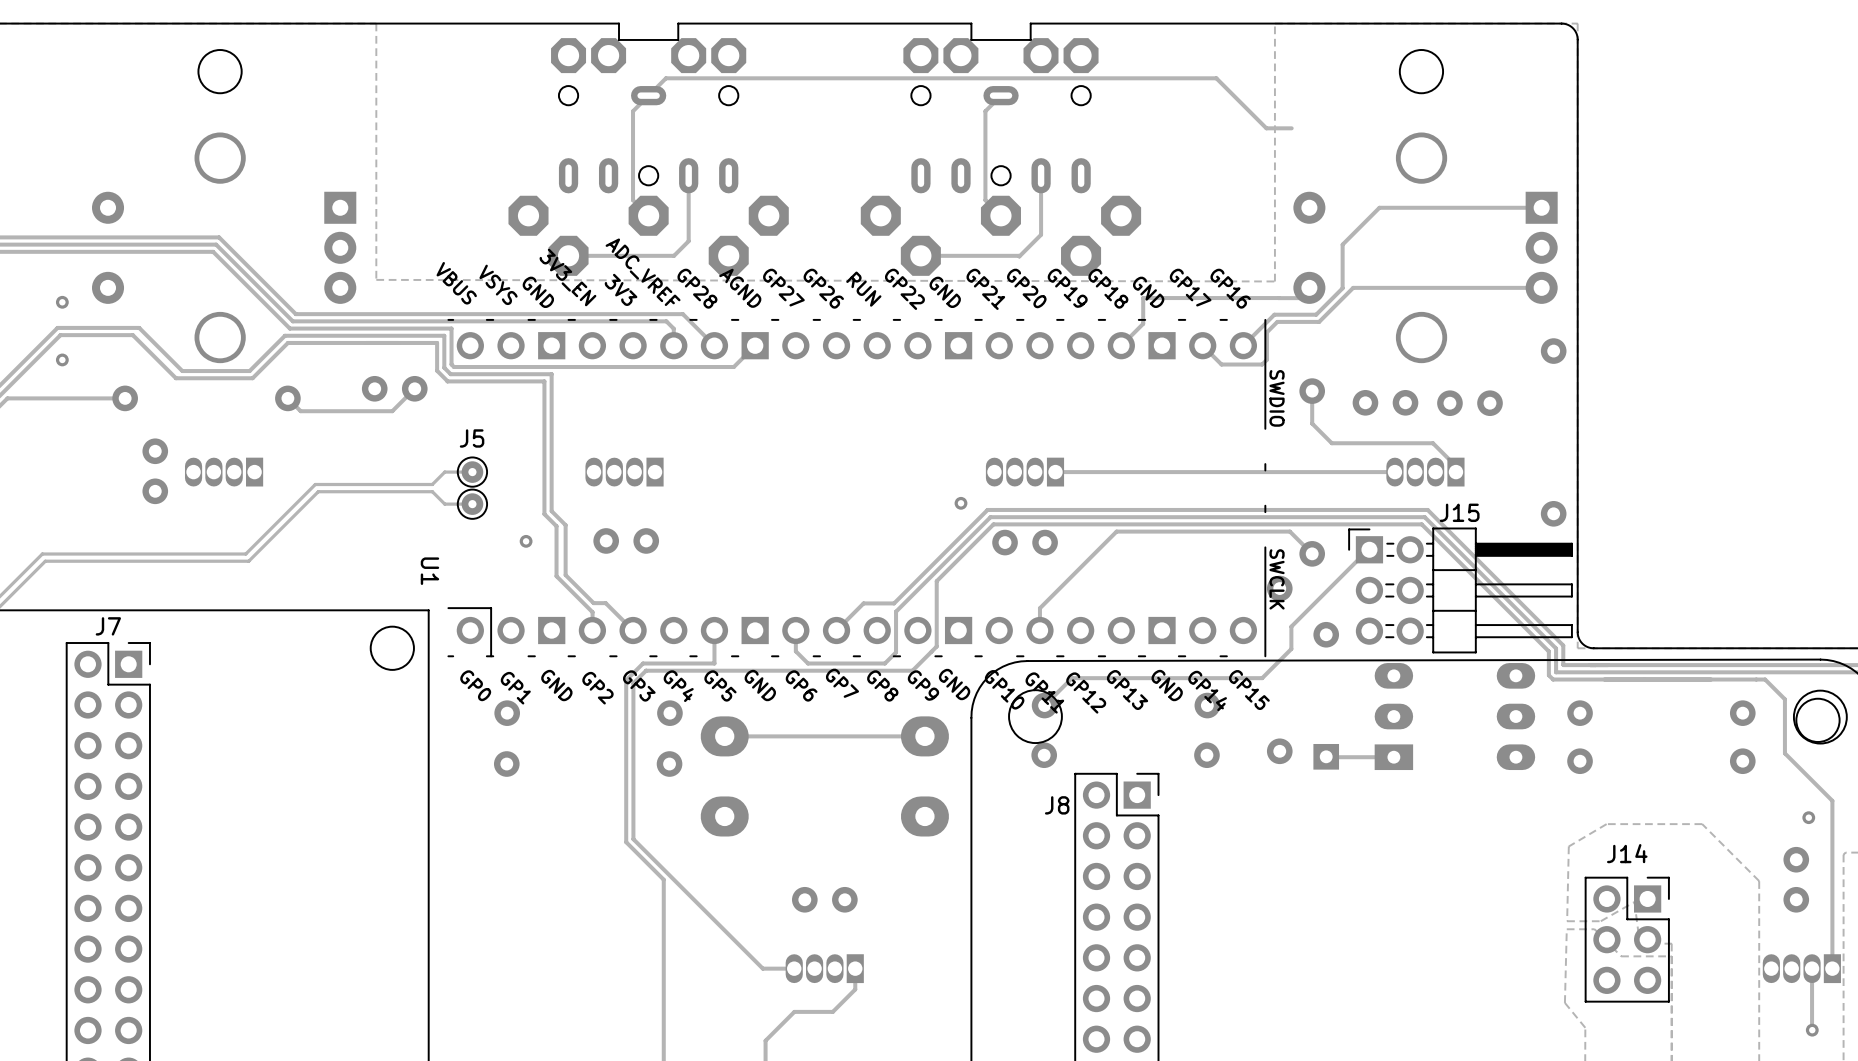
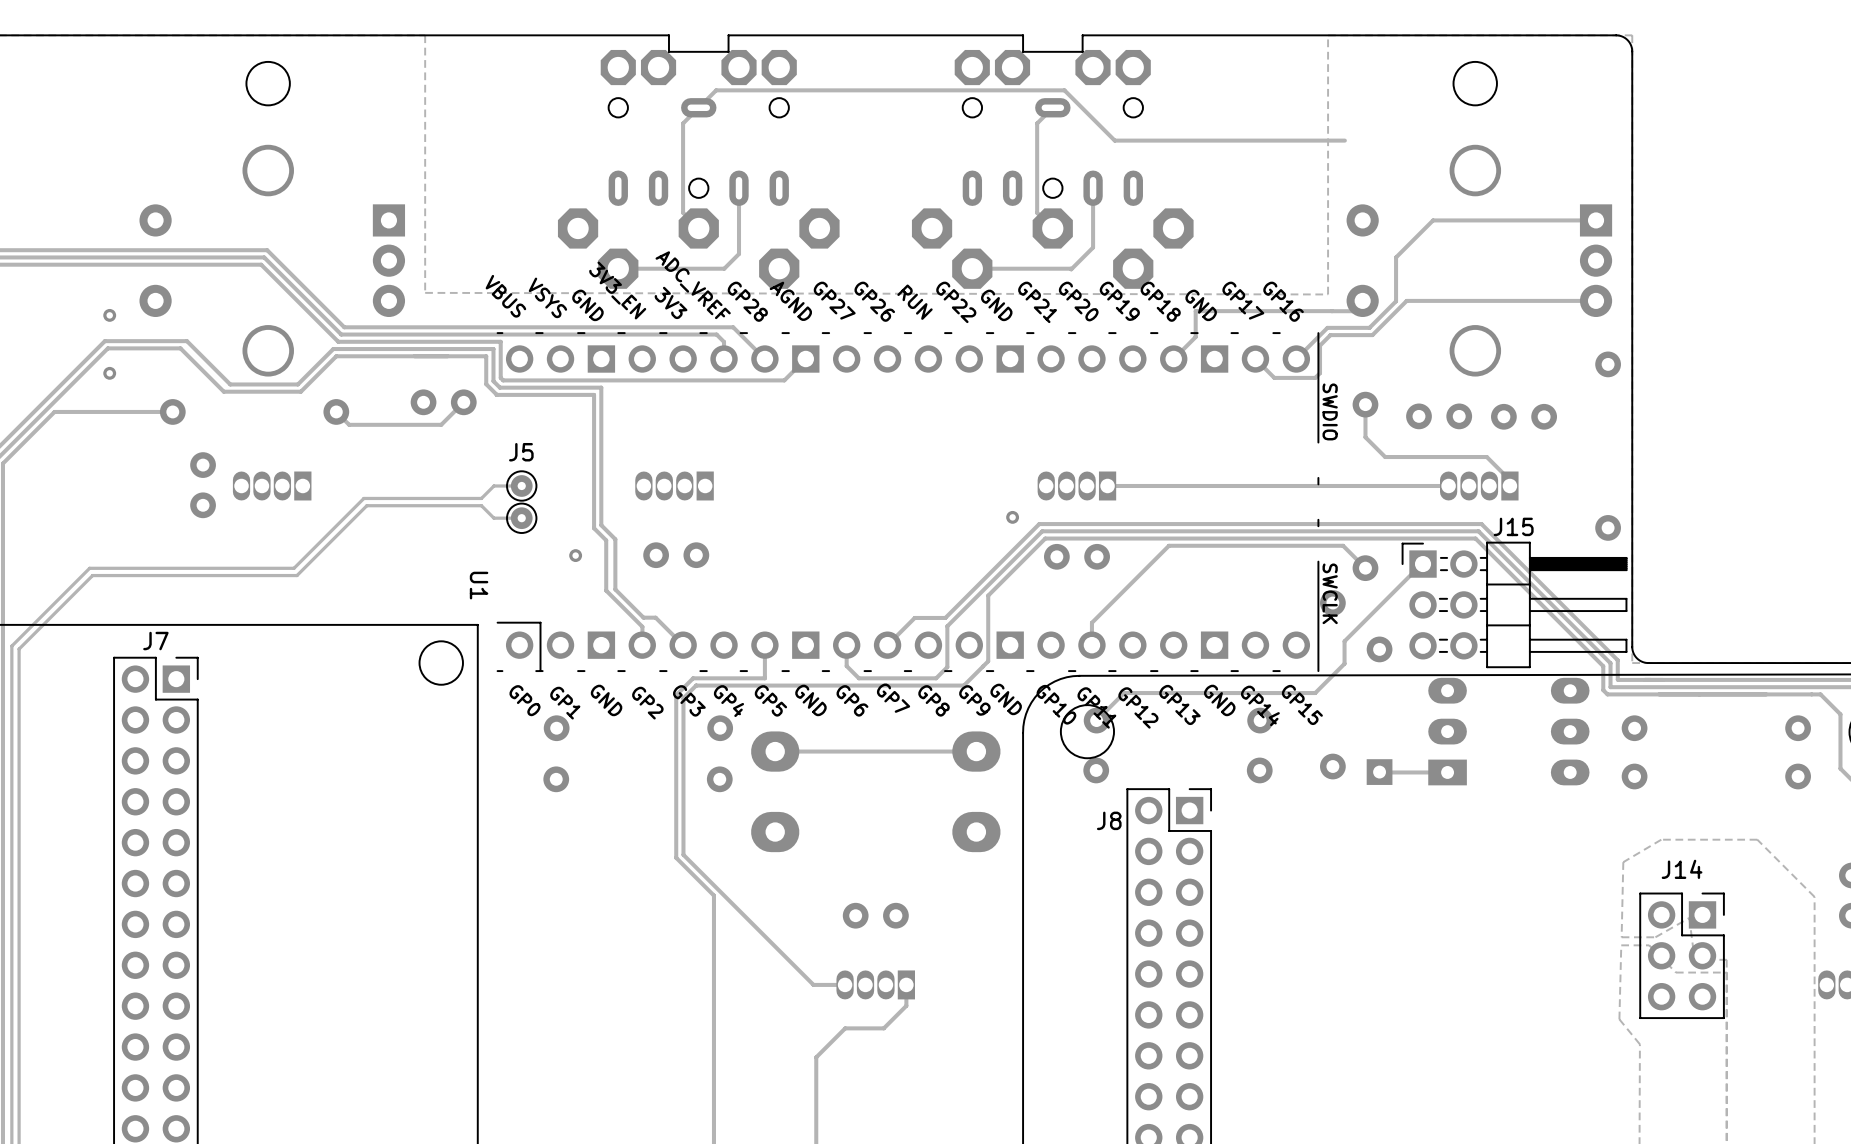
track: (1012, 78) (1216, 78) (1266, 128) -> (1064, 90) (1114, 140) (1319, 140)

